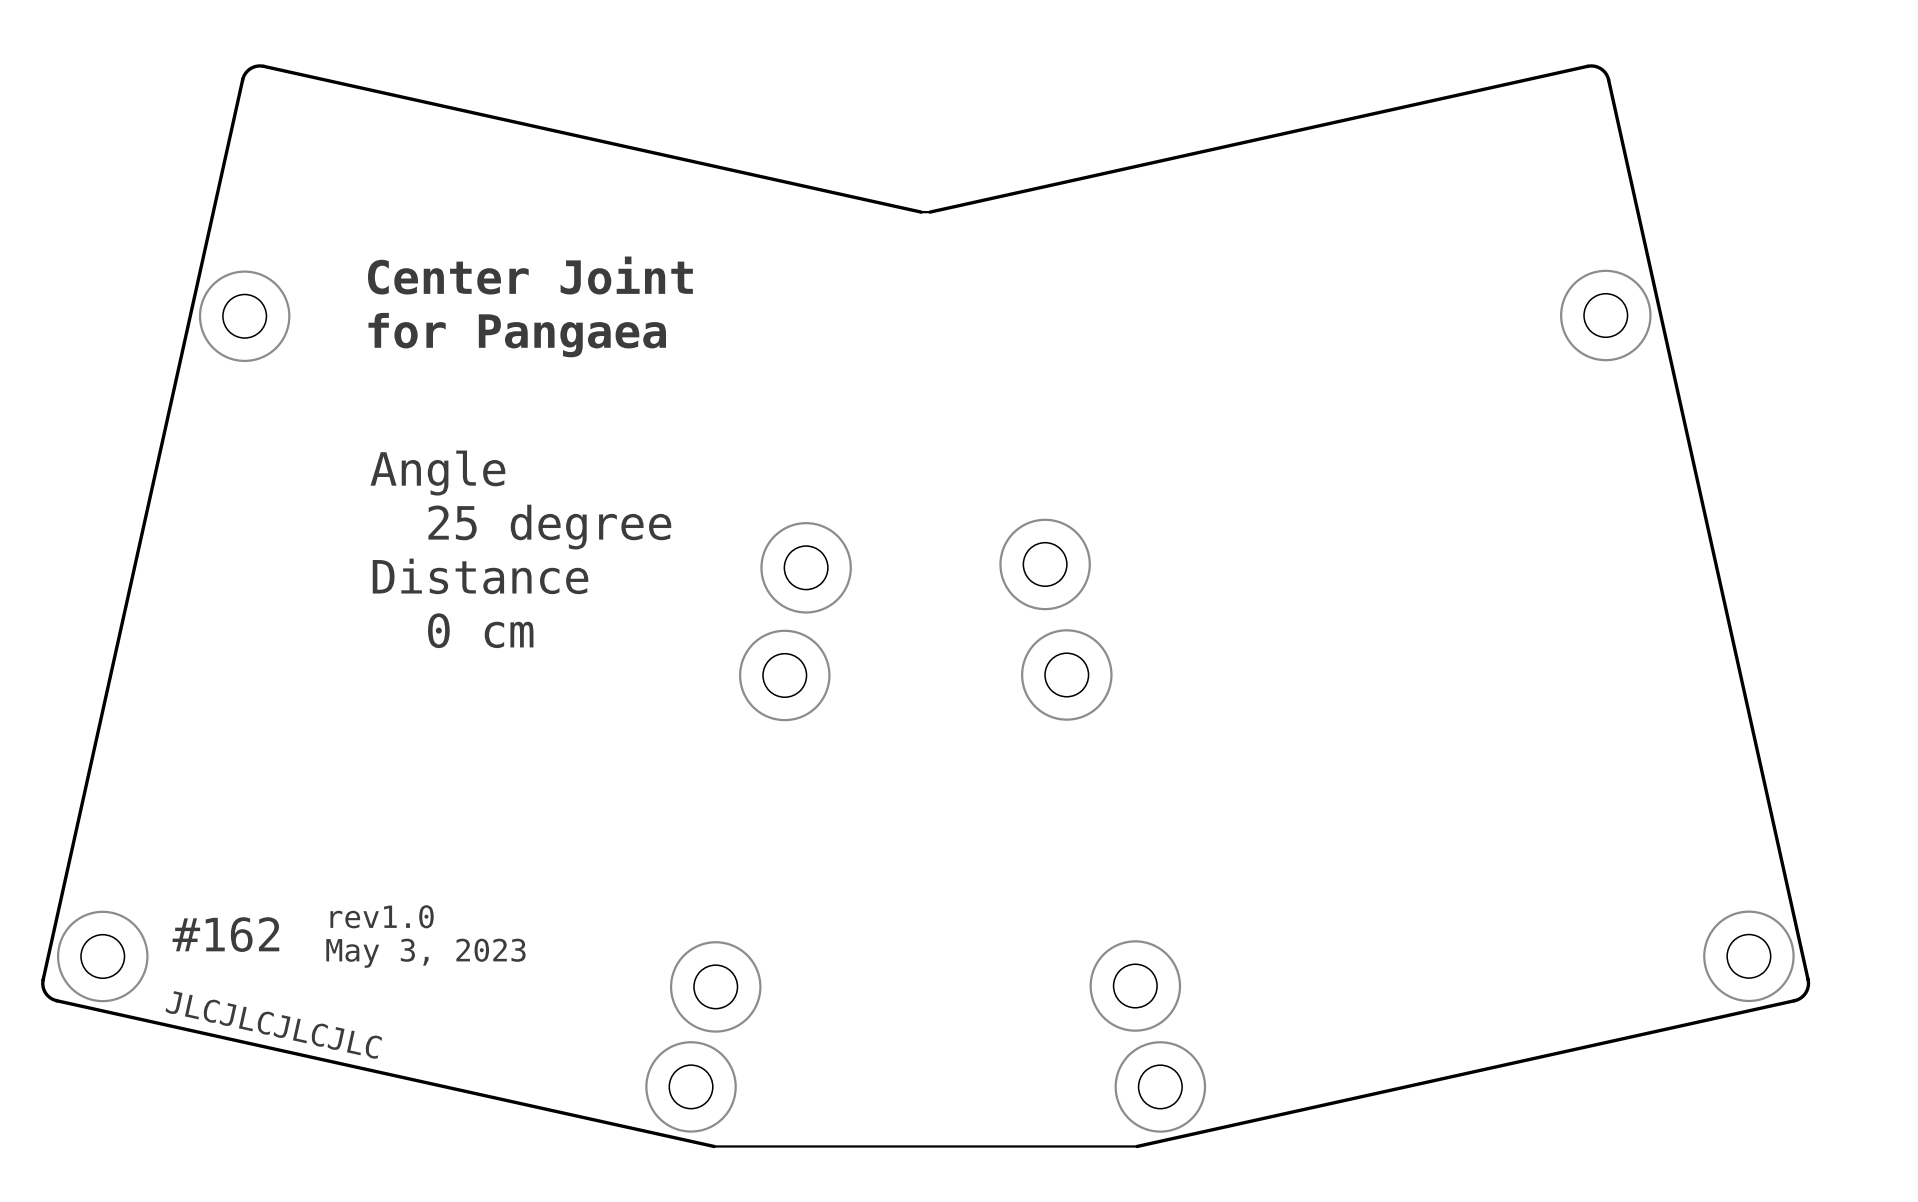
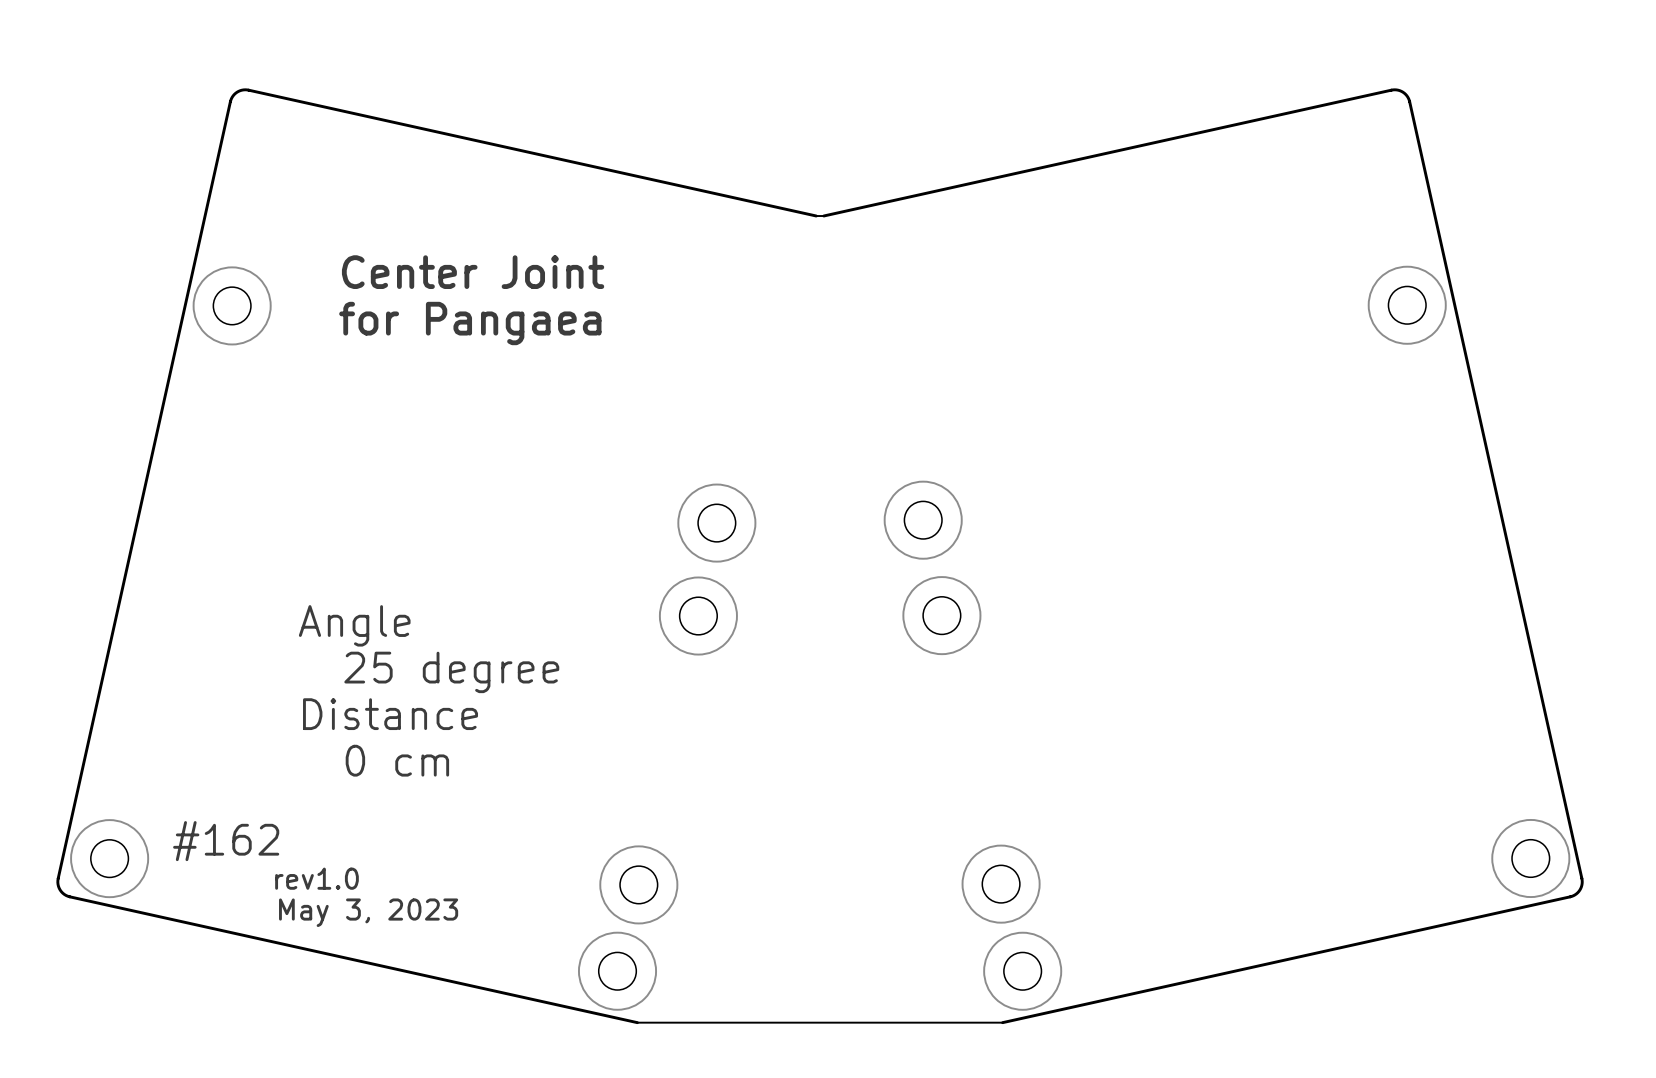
text position: Angle (437, 473) -> Angle (354, 625)
text position: 25 degree (549, 527) -> 25 degree (451, 672)
text position: Distance (480, 576) -> Distance (390, 714)
text position: 0 cm (480, 630) -> 0 cm (397, 760)
text position: rev1.0 (382, 916) -> rev1.0 (316, 878)
text position: May 3, 2023 (425, 953) -> May 3, 2023 (368, 912)
text: JLCJLCJLCJLC (273, 1024) -> none

